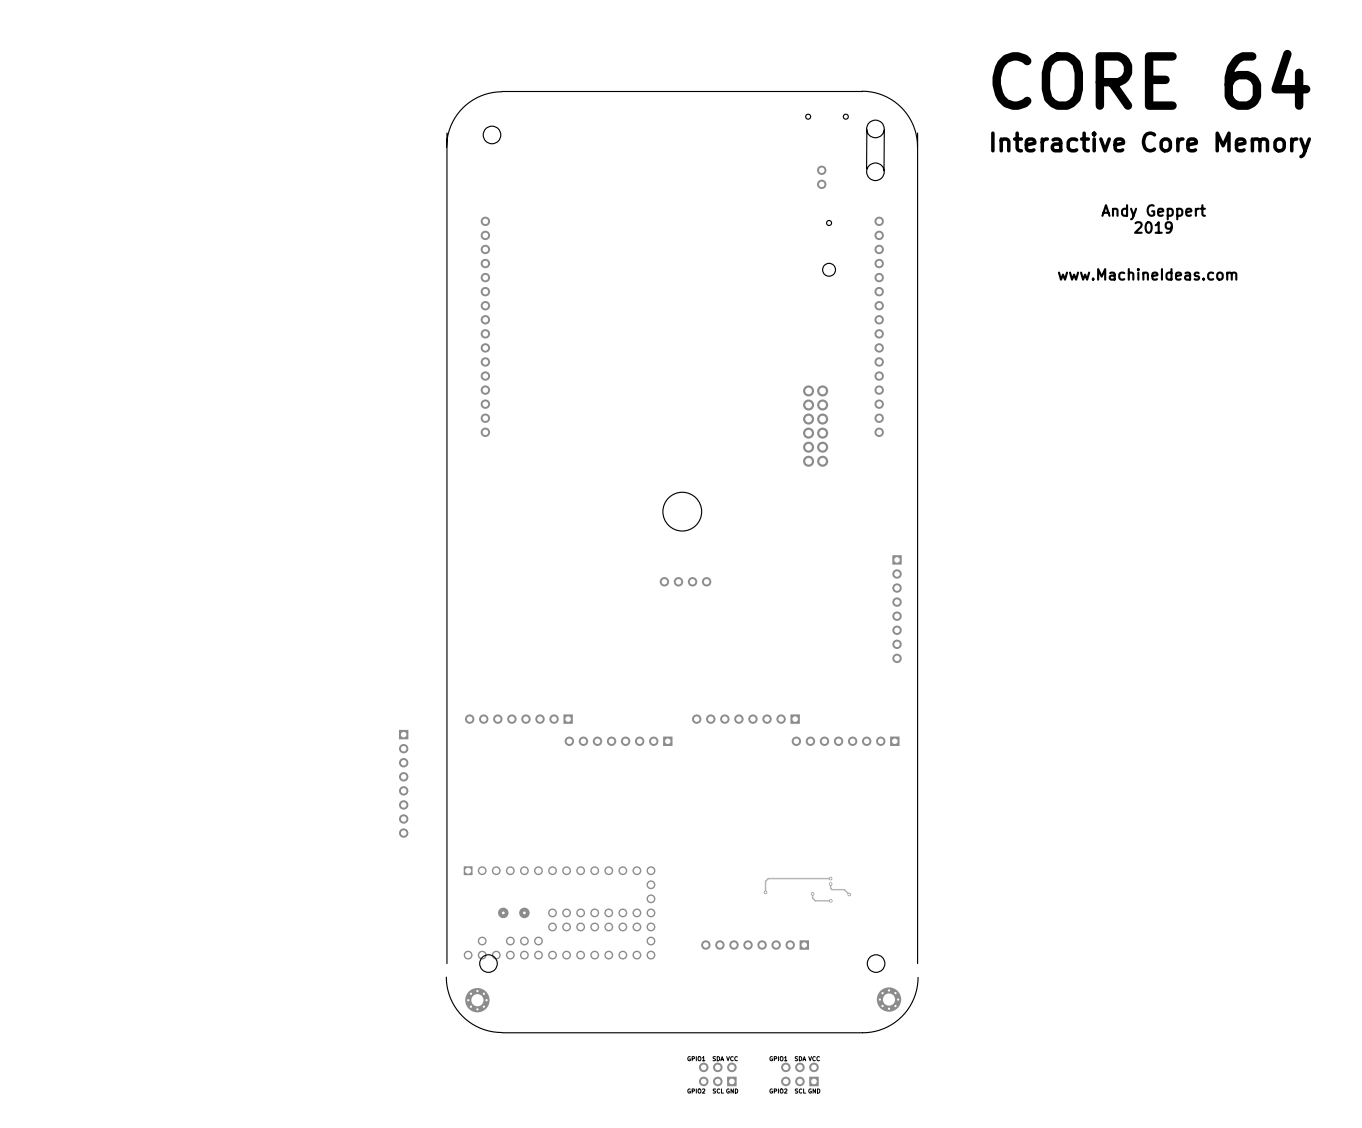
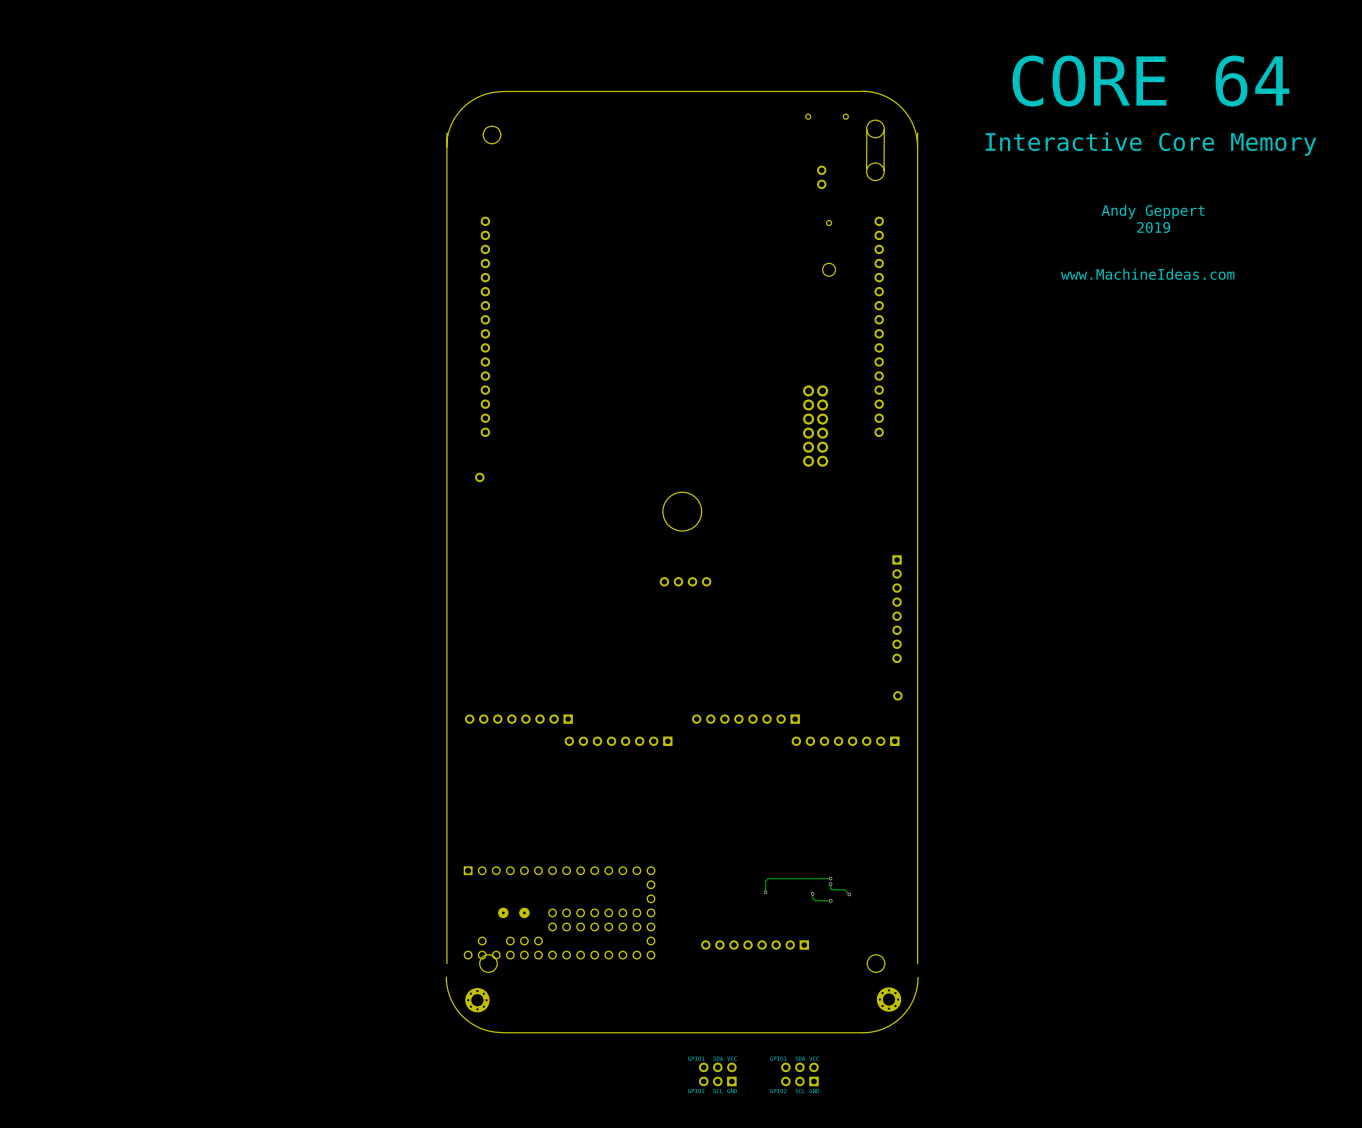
part: none -> (479, 477)
part: none -> (897, 695)
part: (403, 783) -> none

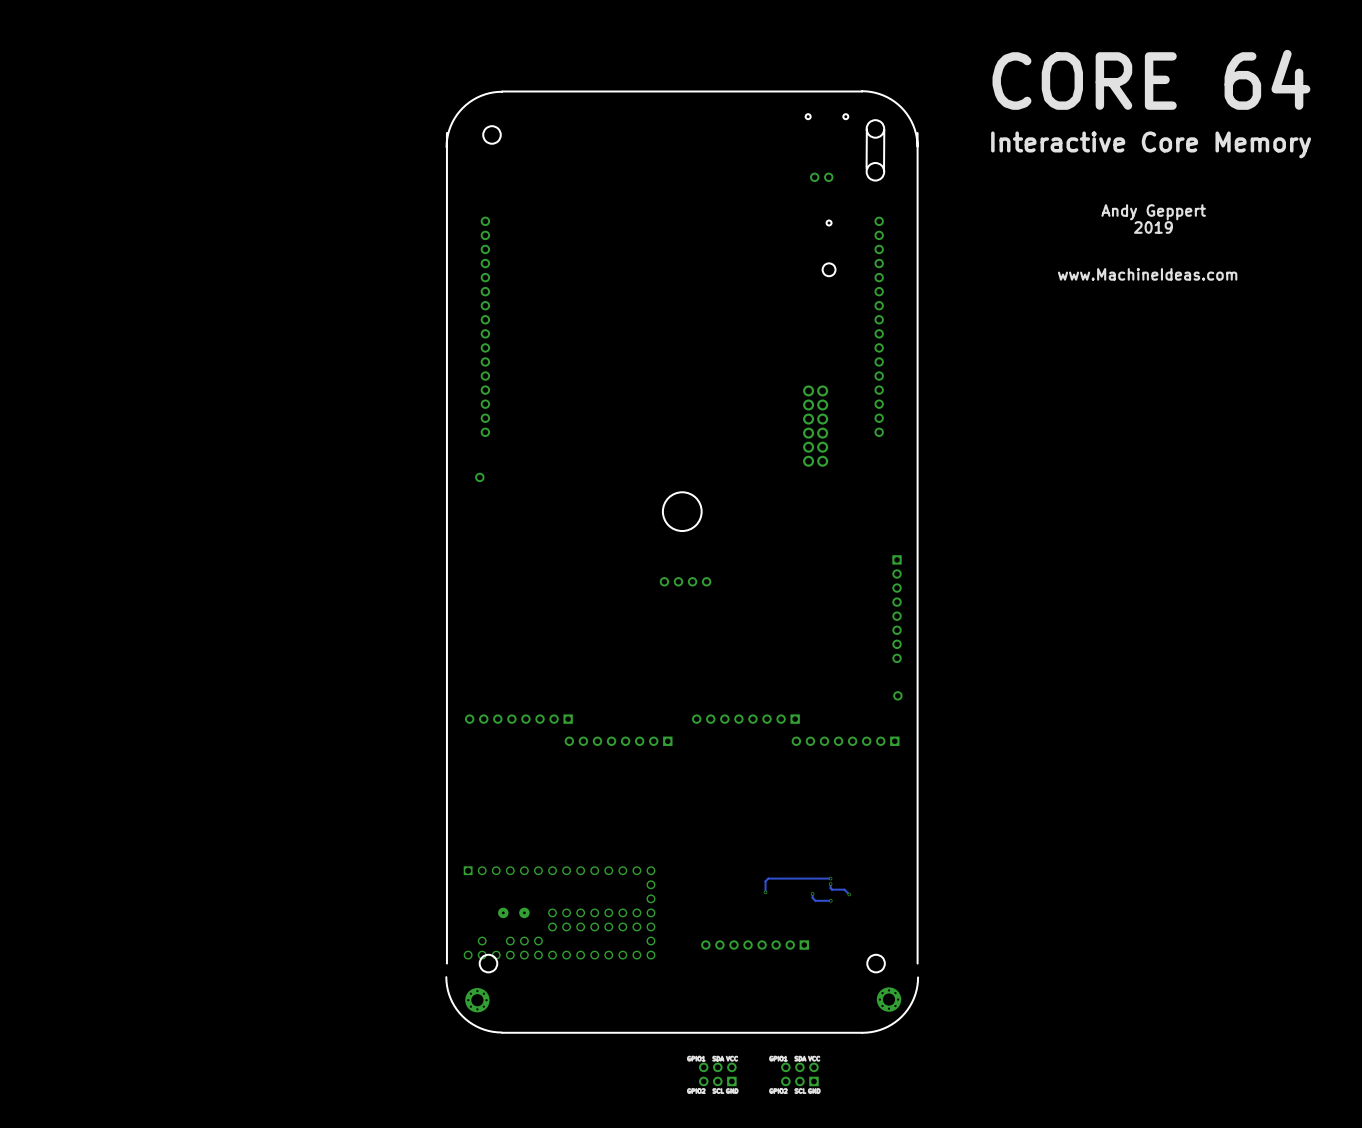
part rotation: 0° (821, 177) -> 90° clockwise (821, 177)

